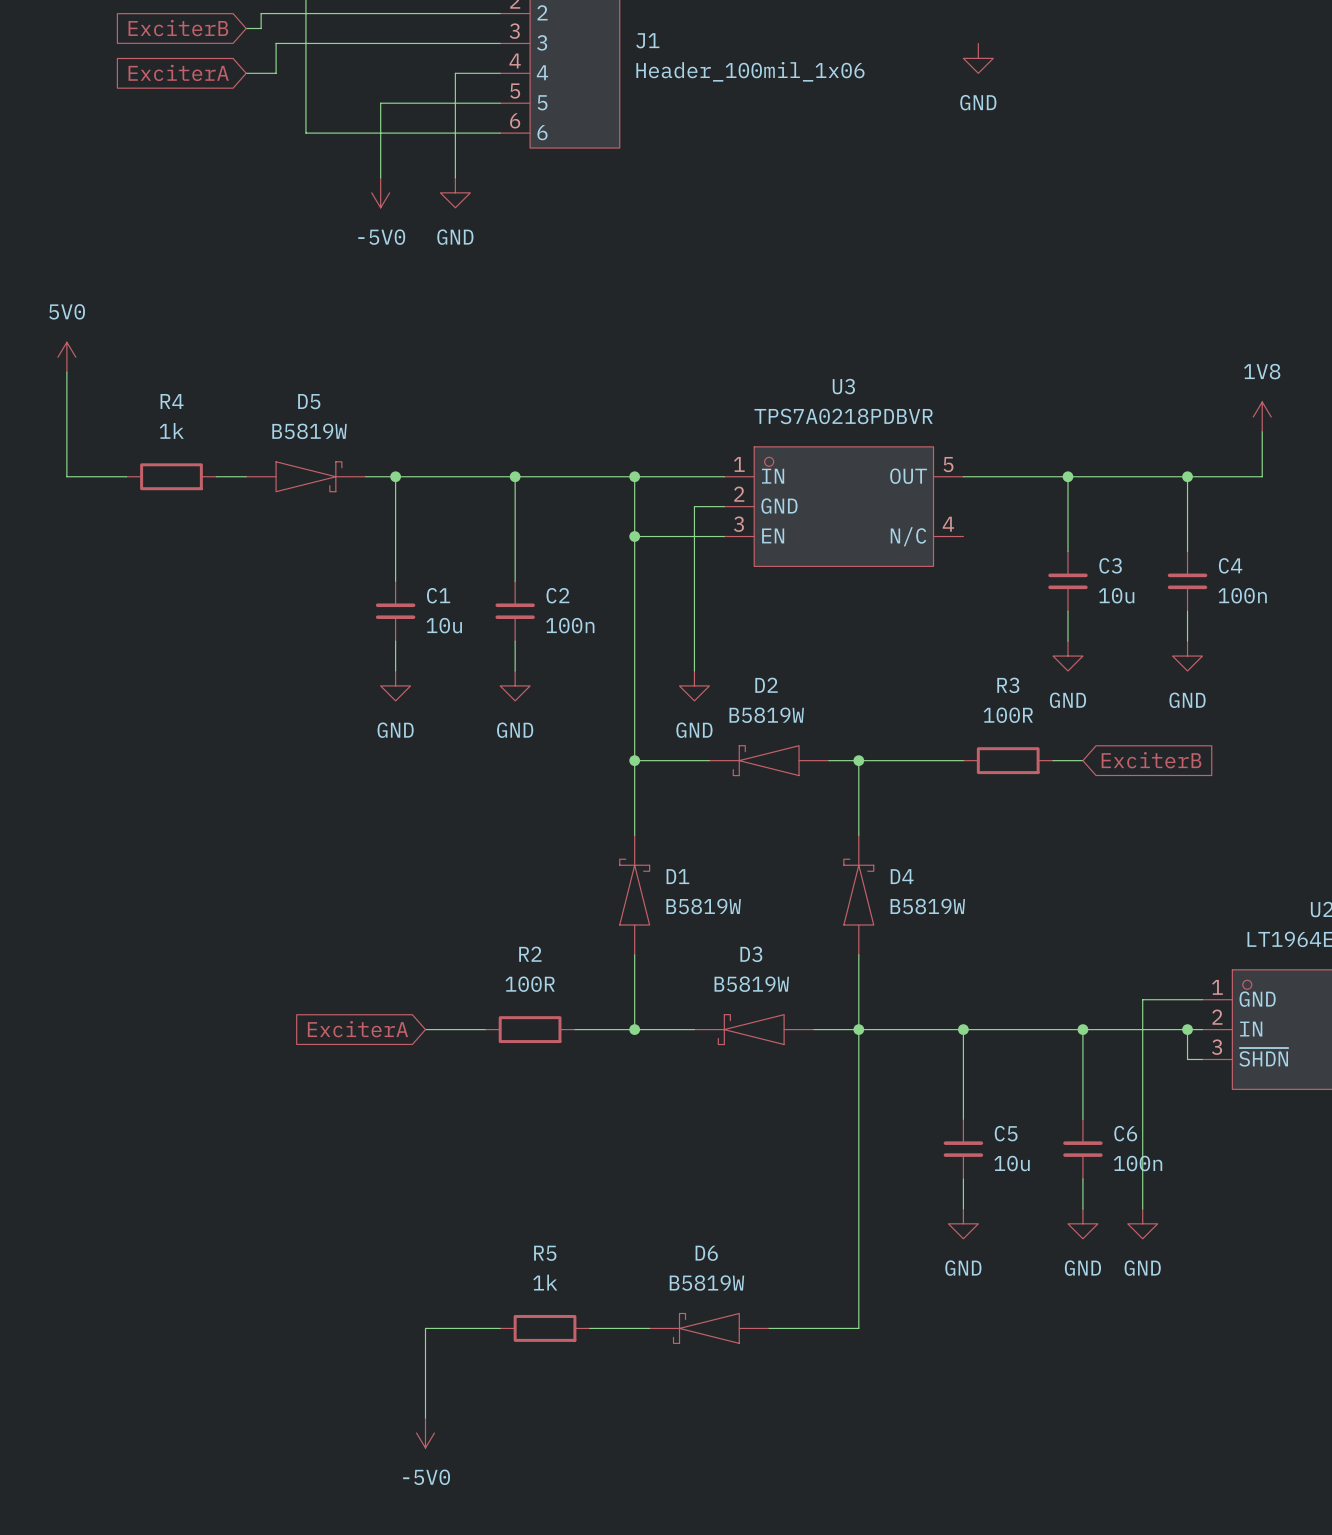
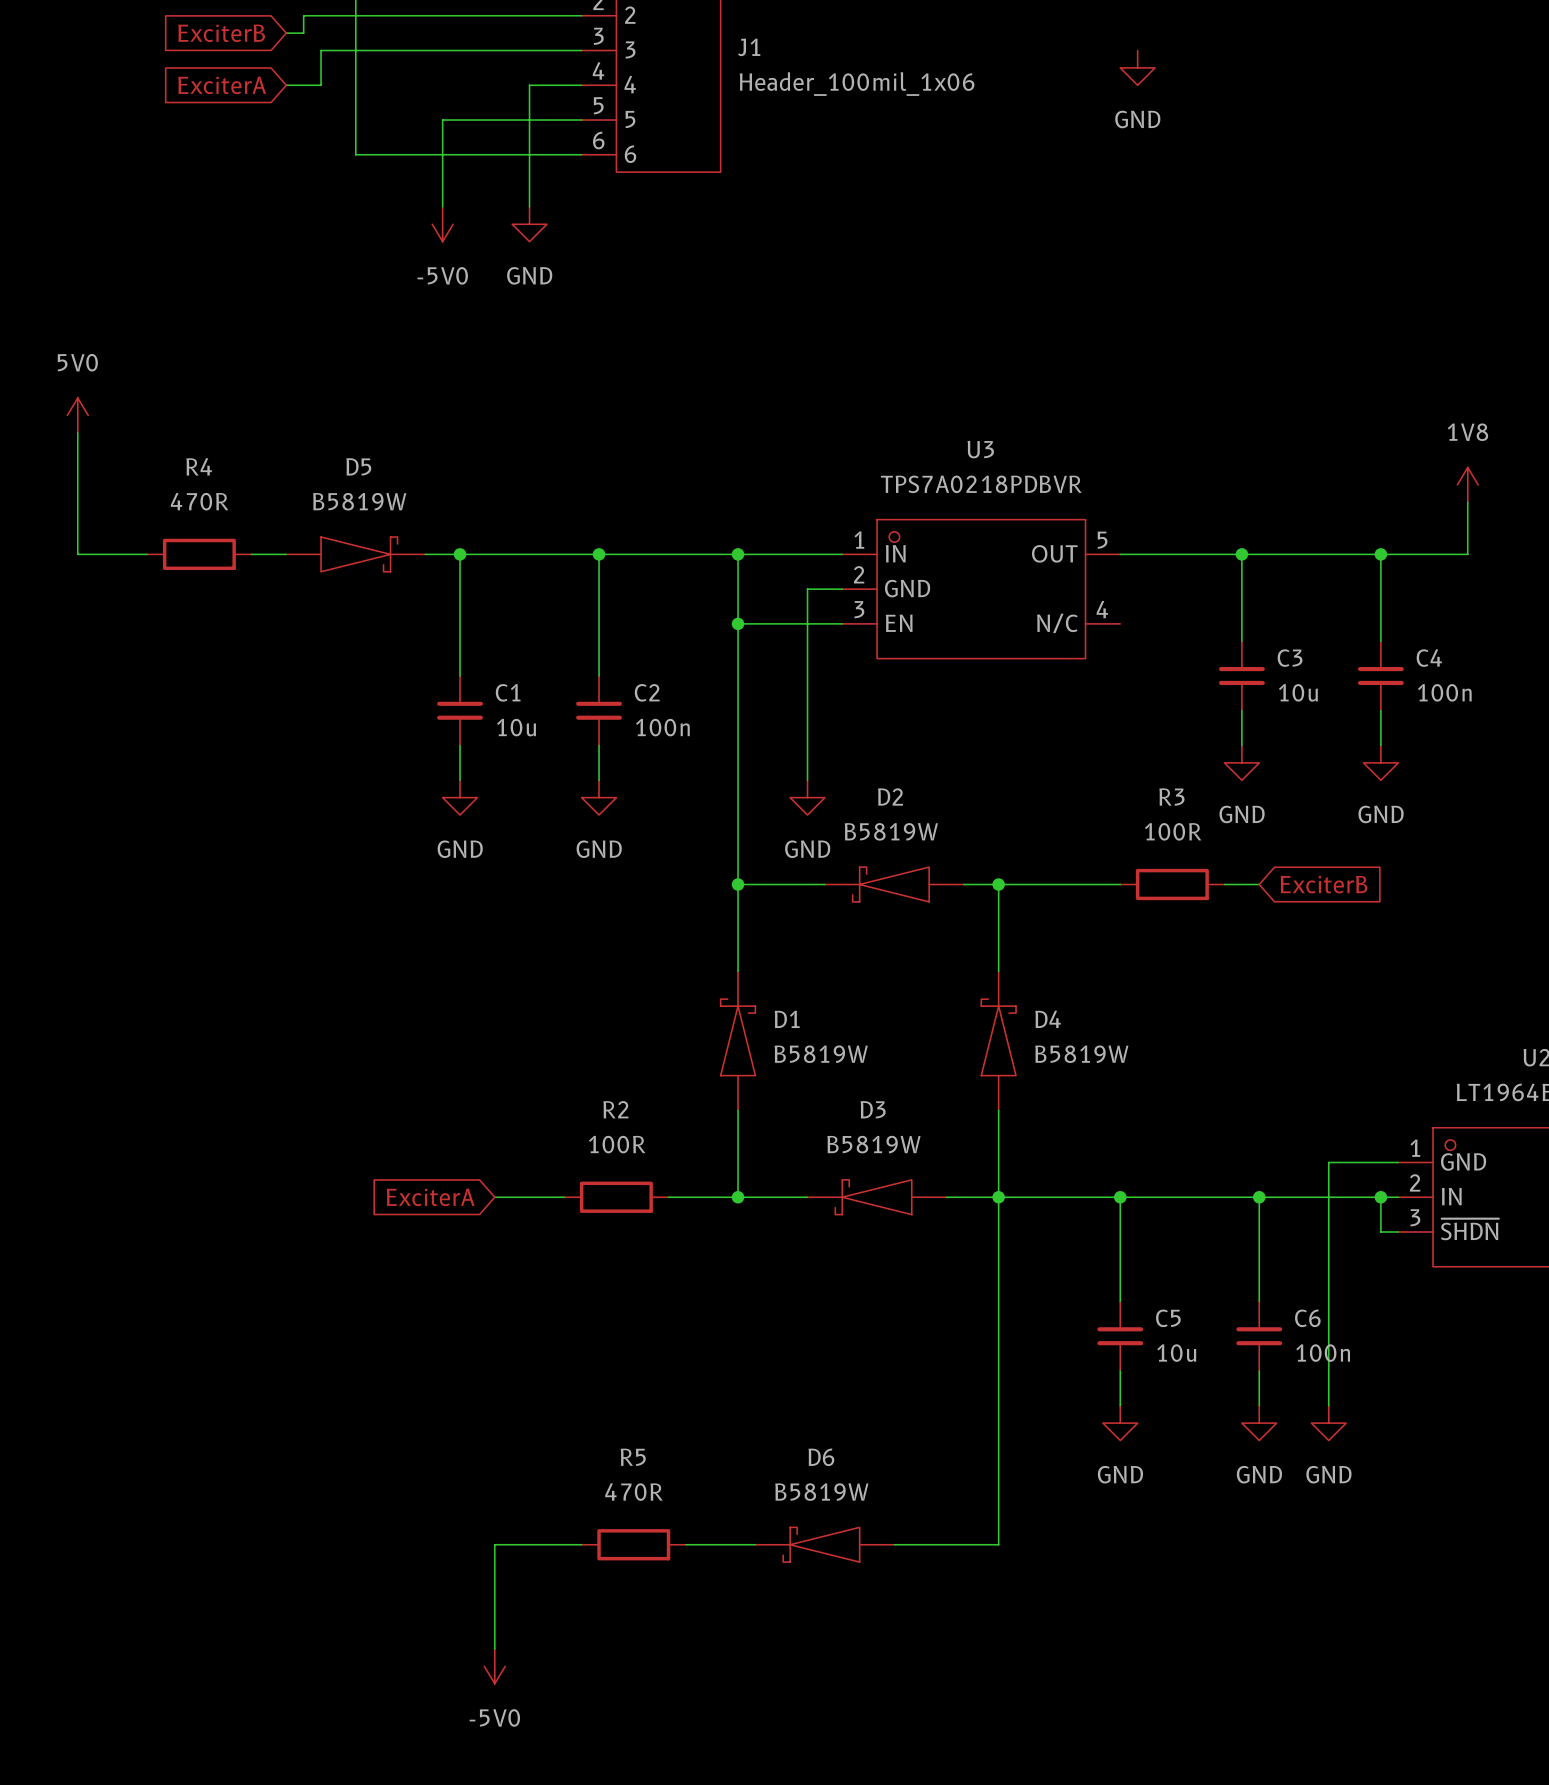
R4 value: 1k (171, 430) -> 470R (199, 501)
R5 value: 1k (545, 1282) -> 470R (633, 1492)

